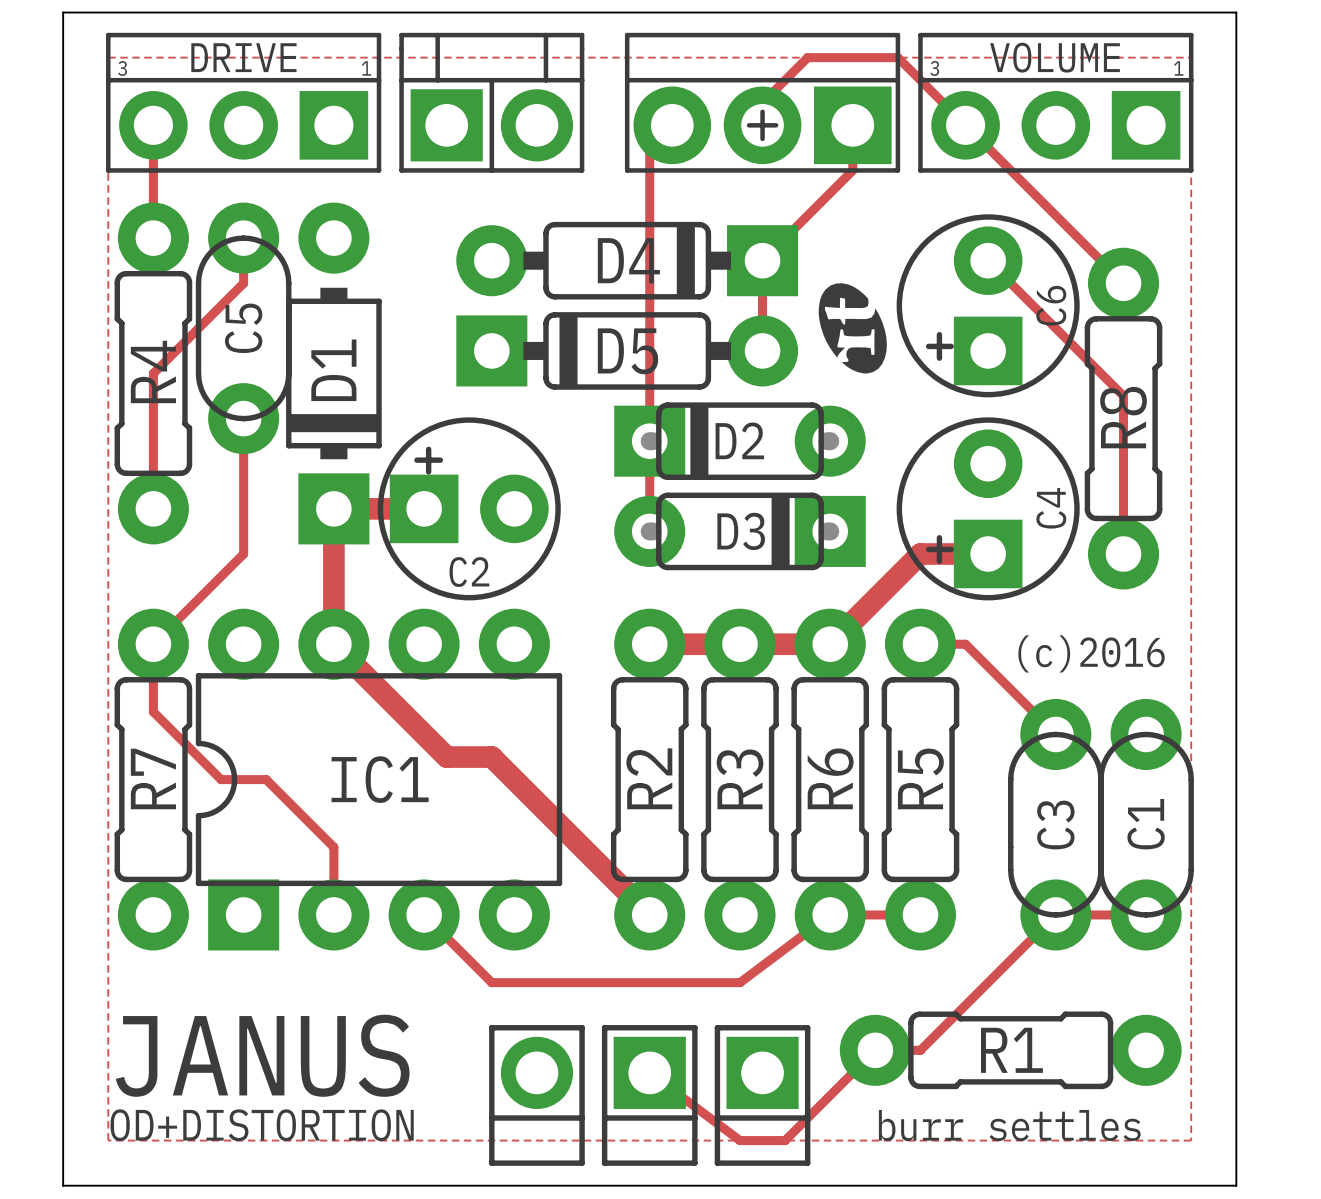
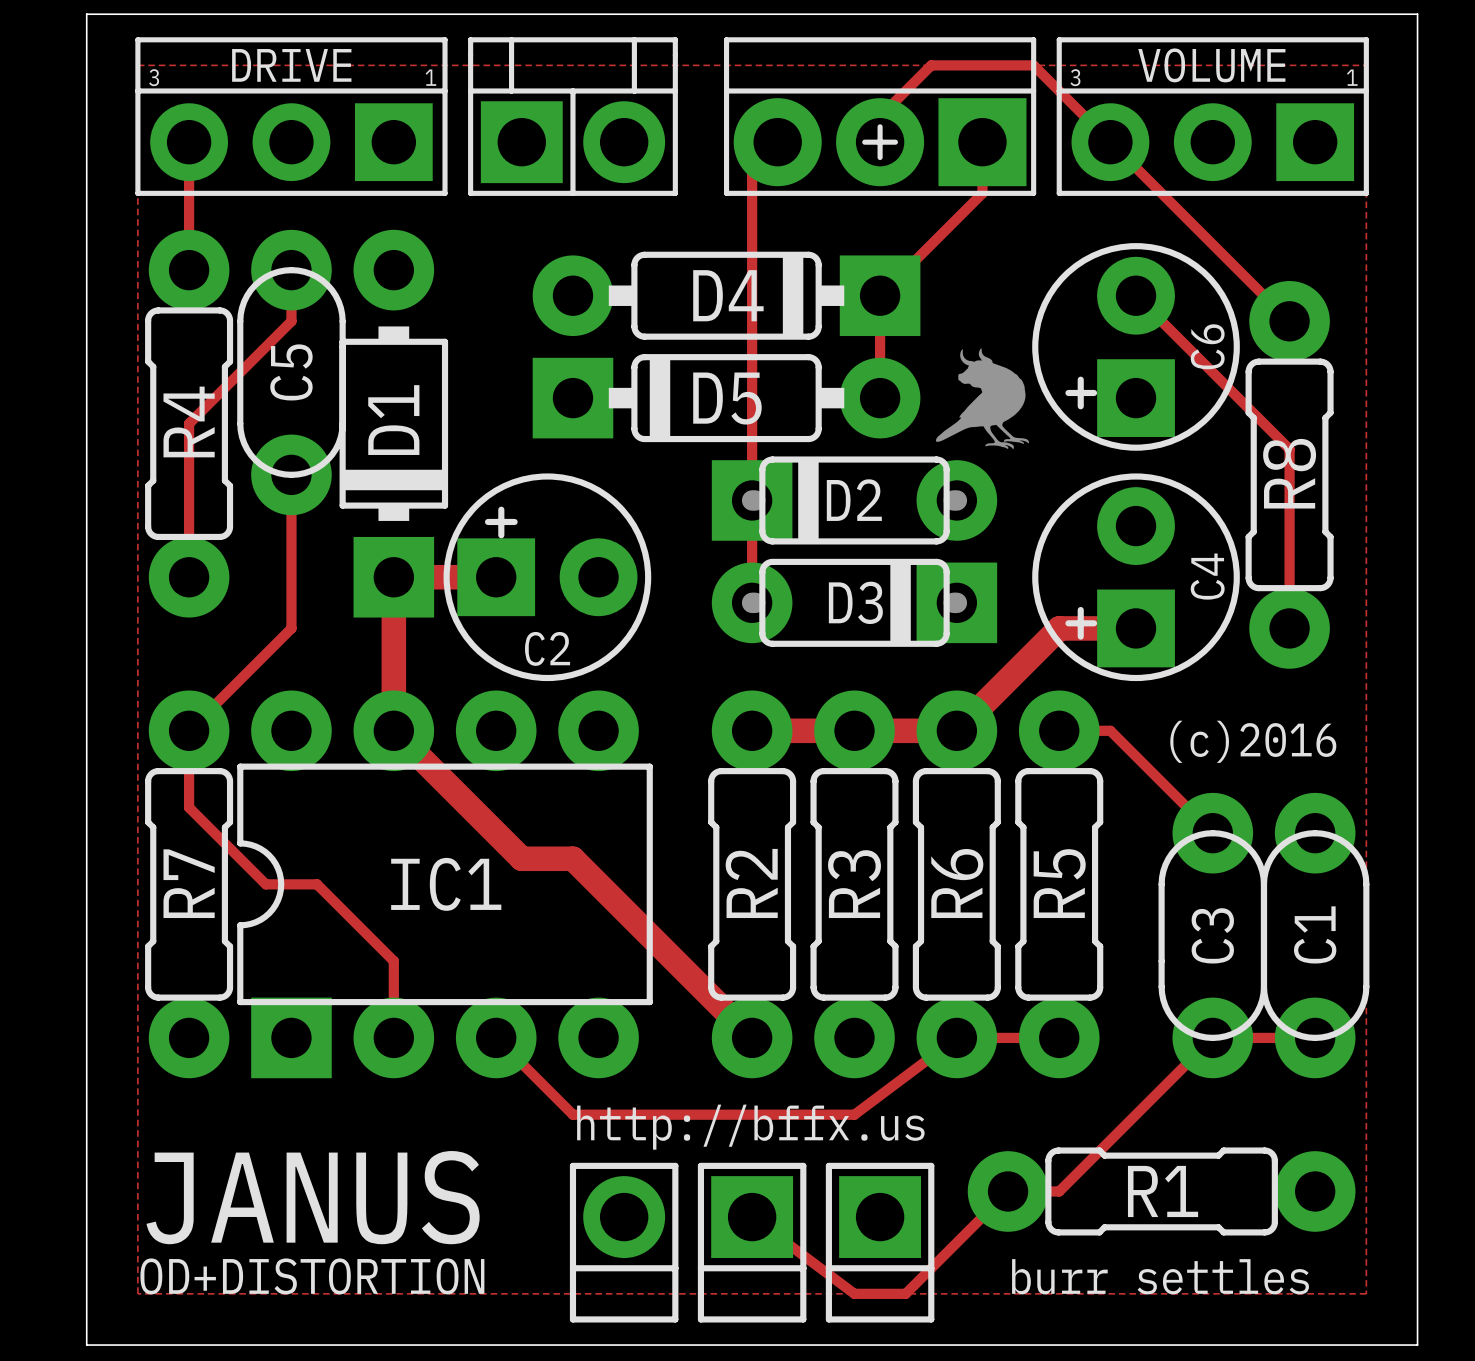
drawing shape: [818, 283, 887, 374] -> [935, 347, 1029, 450]
text: none -> http://bffx.us (750, 1127)

